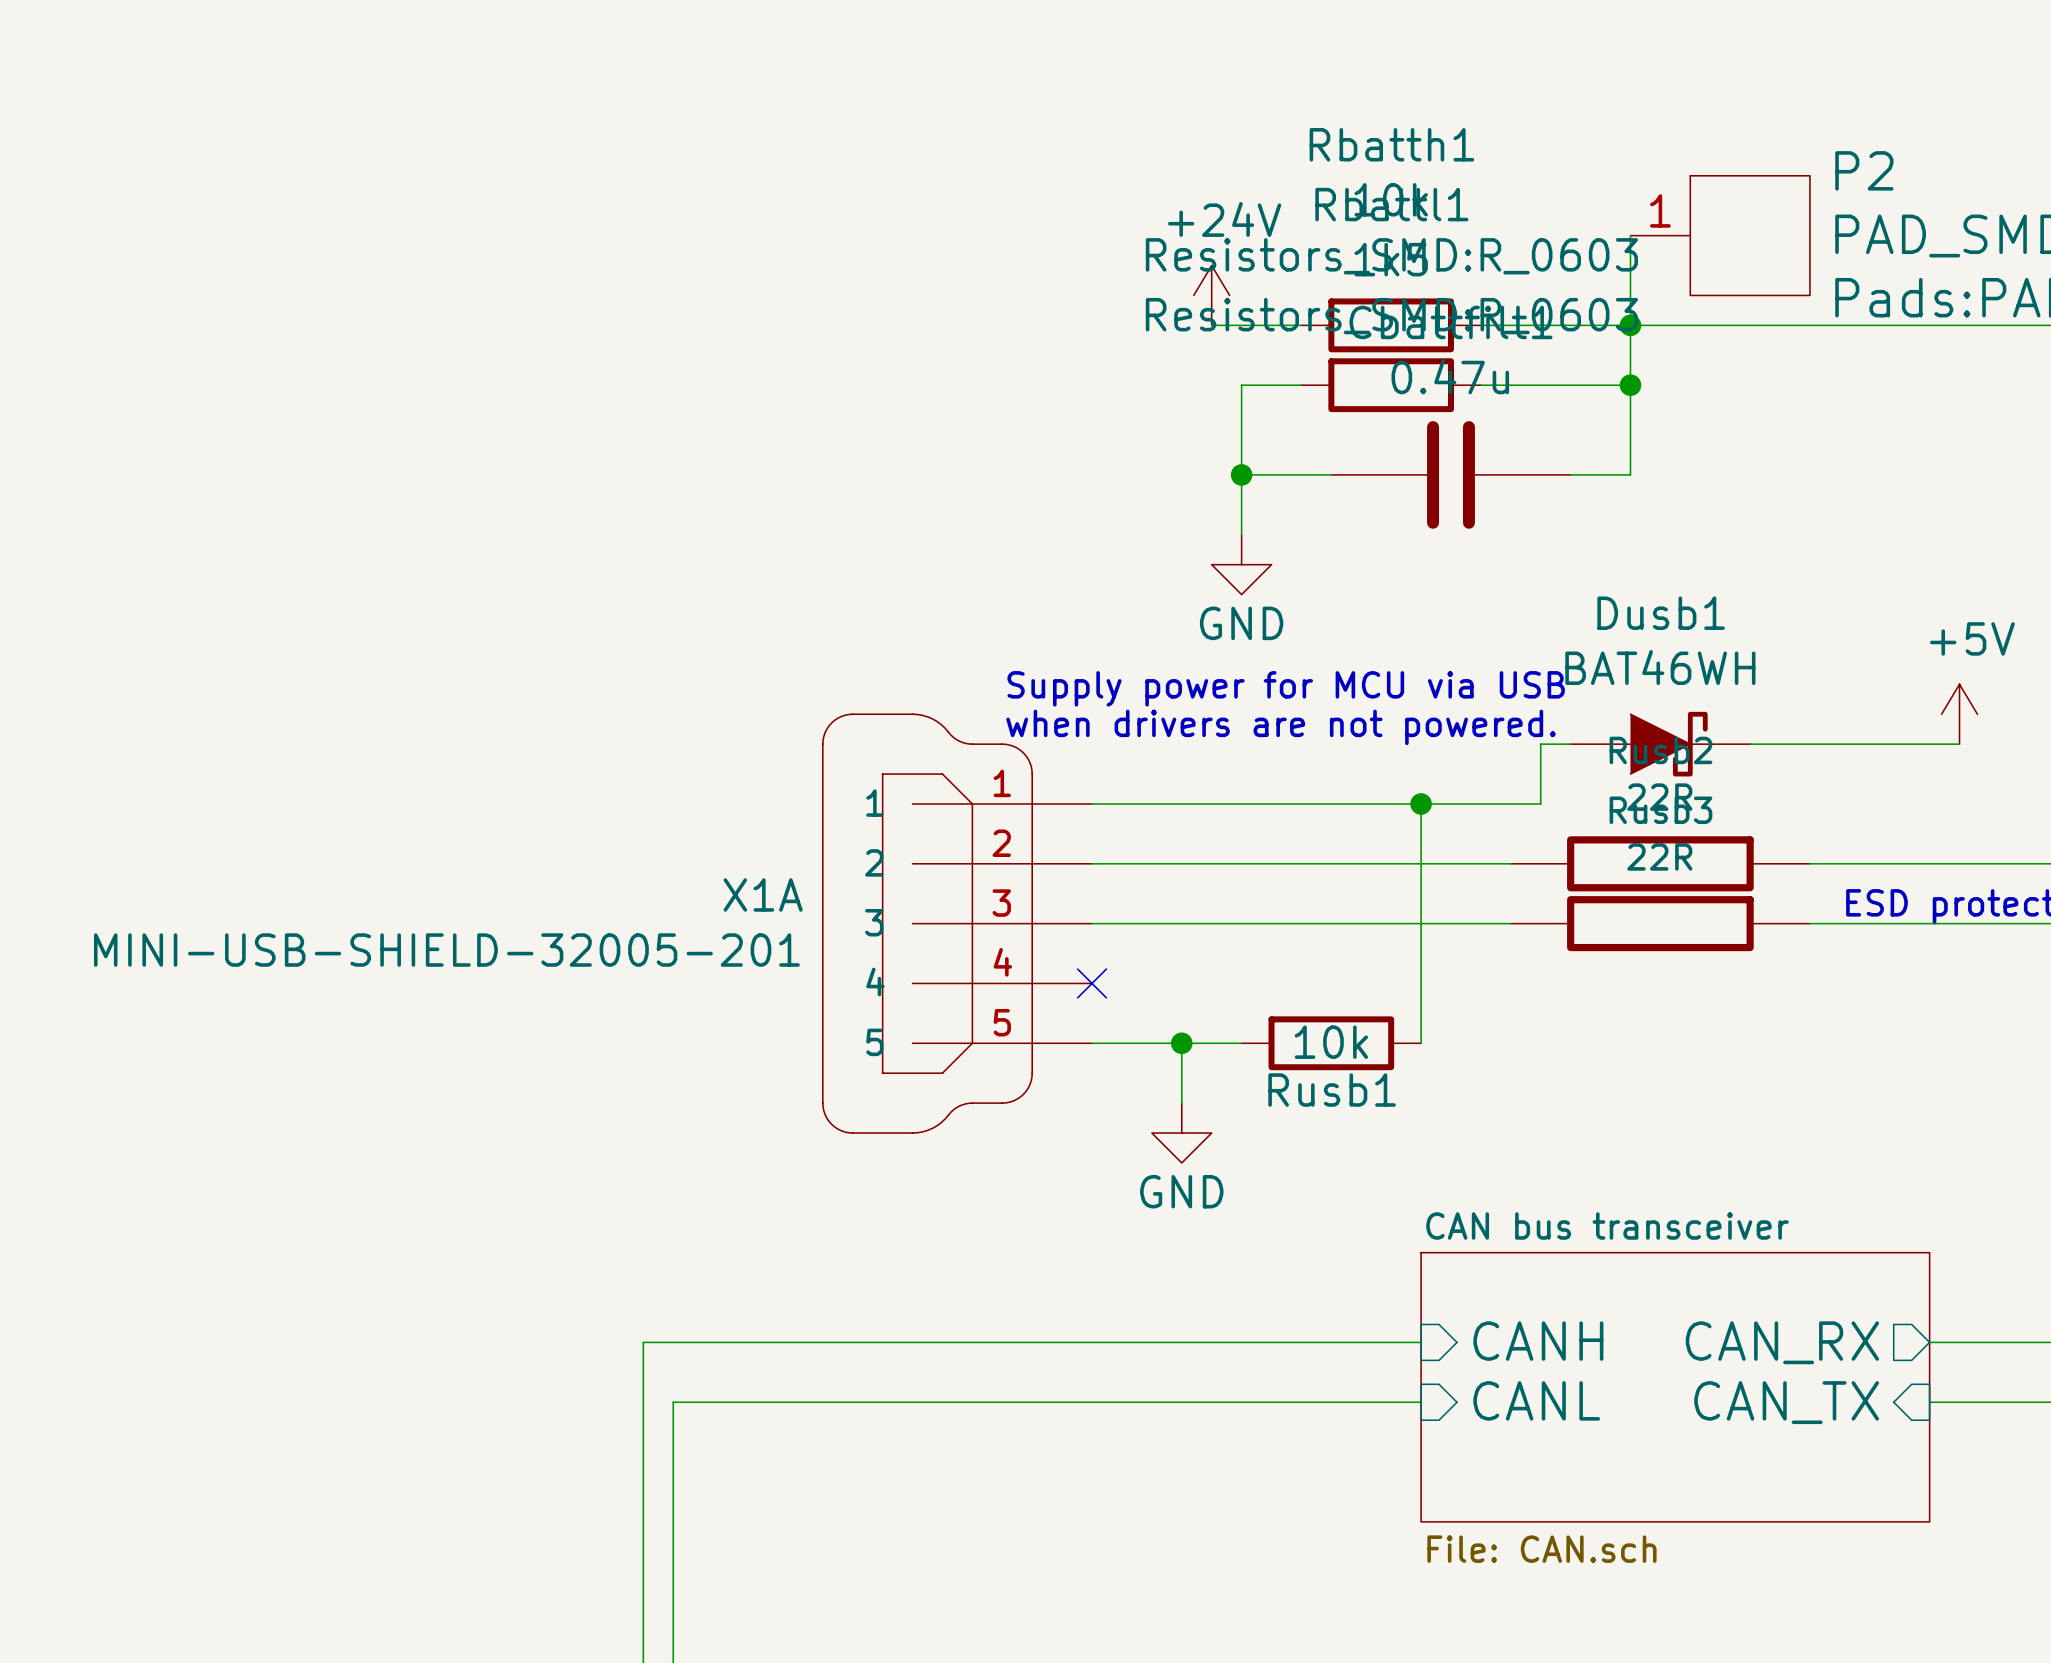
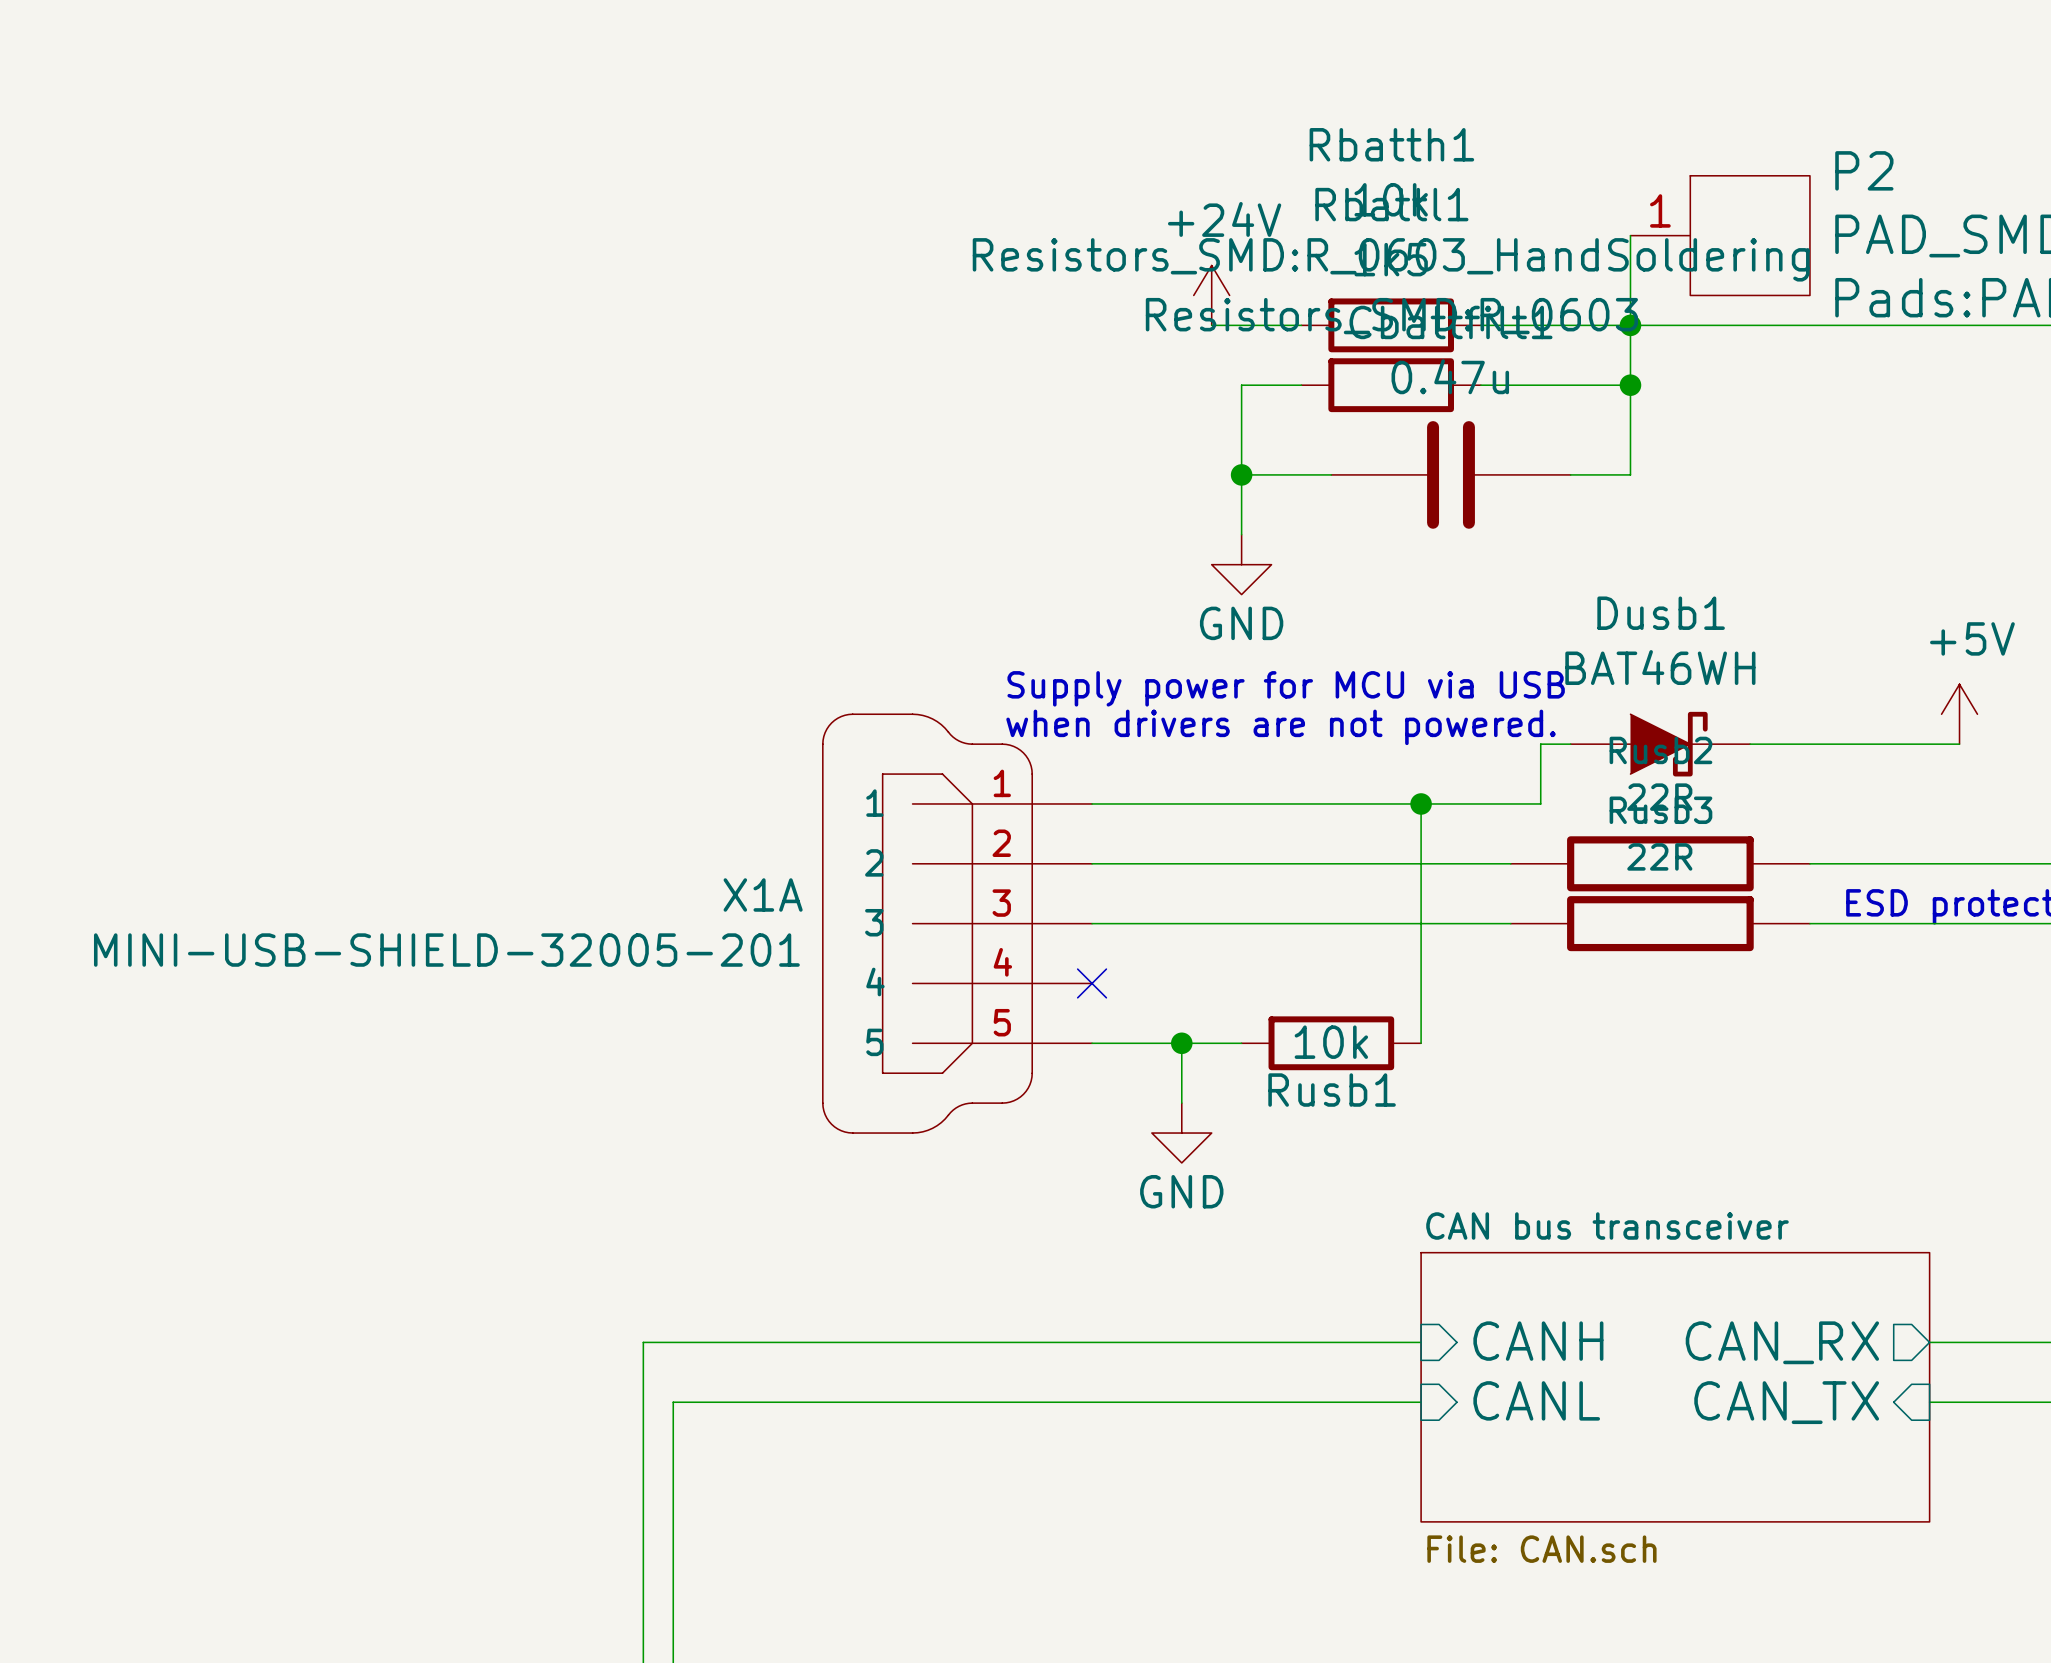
Rbatth1 text: Resistors_SMD:R_0603 (1391, 256) -> Resistors_SMD:R_0603_HandSoldering (1391, 259)

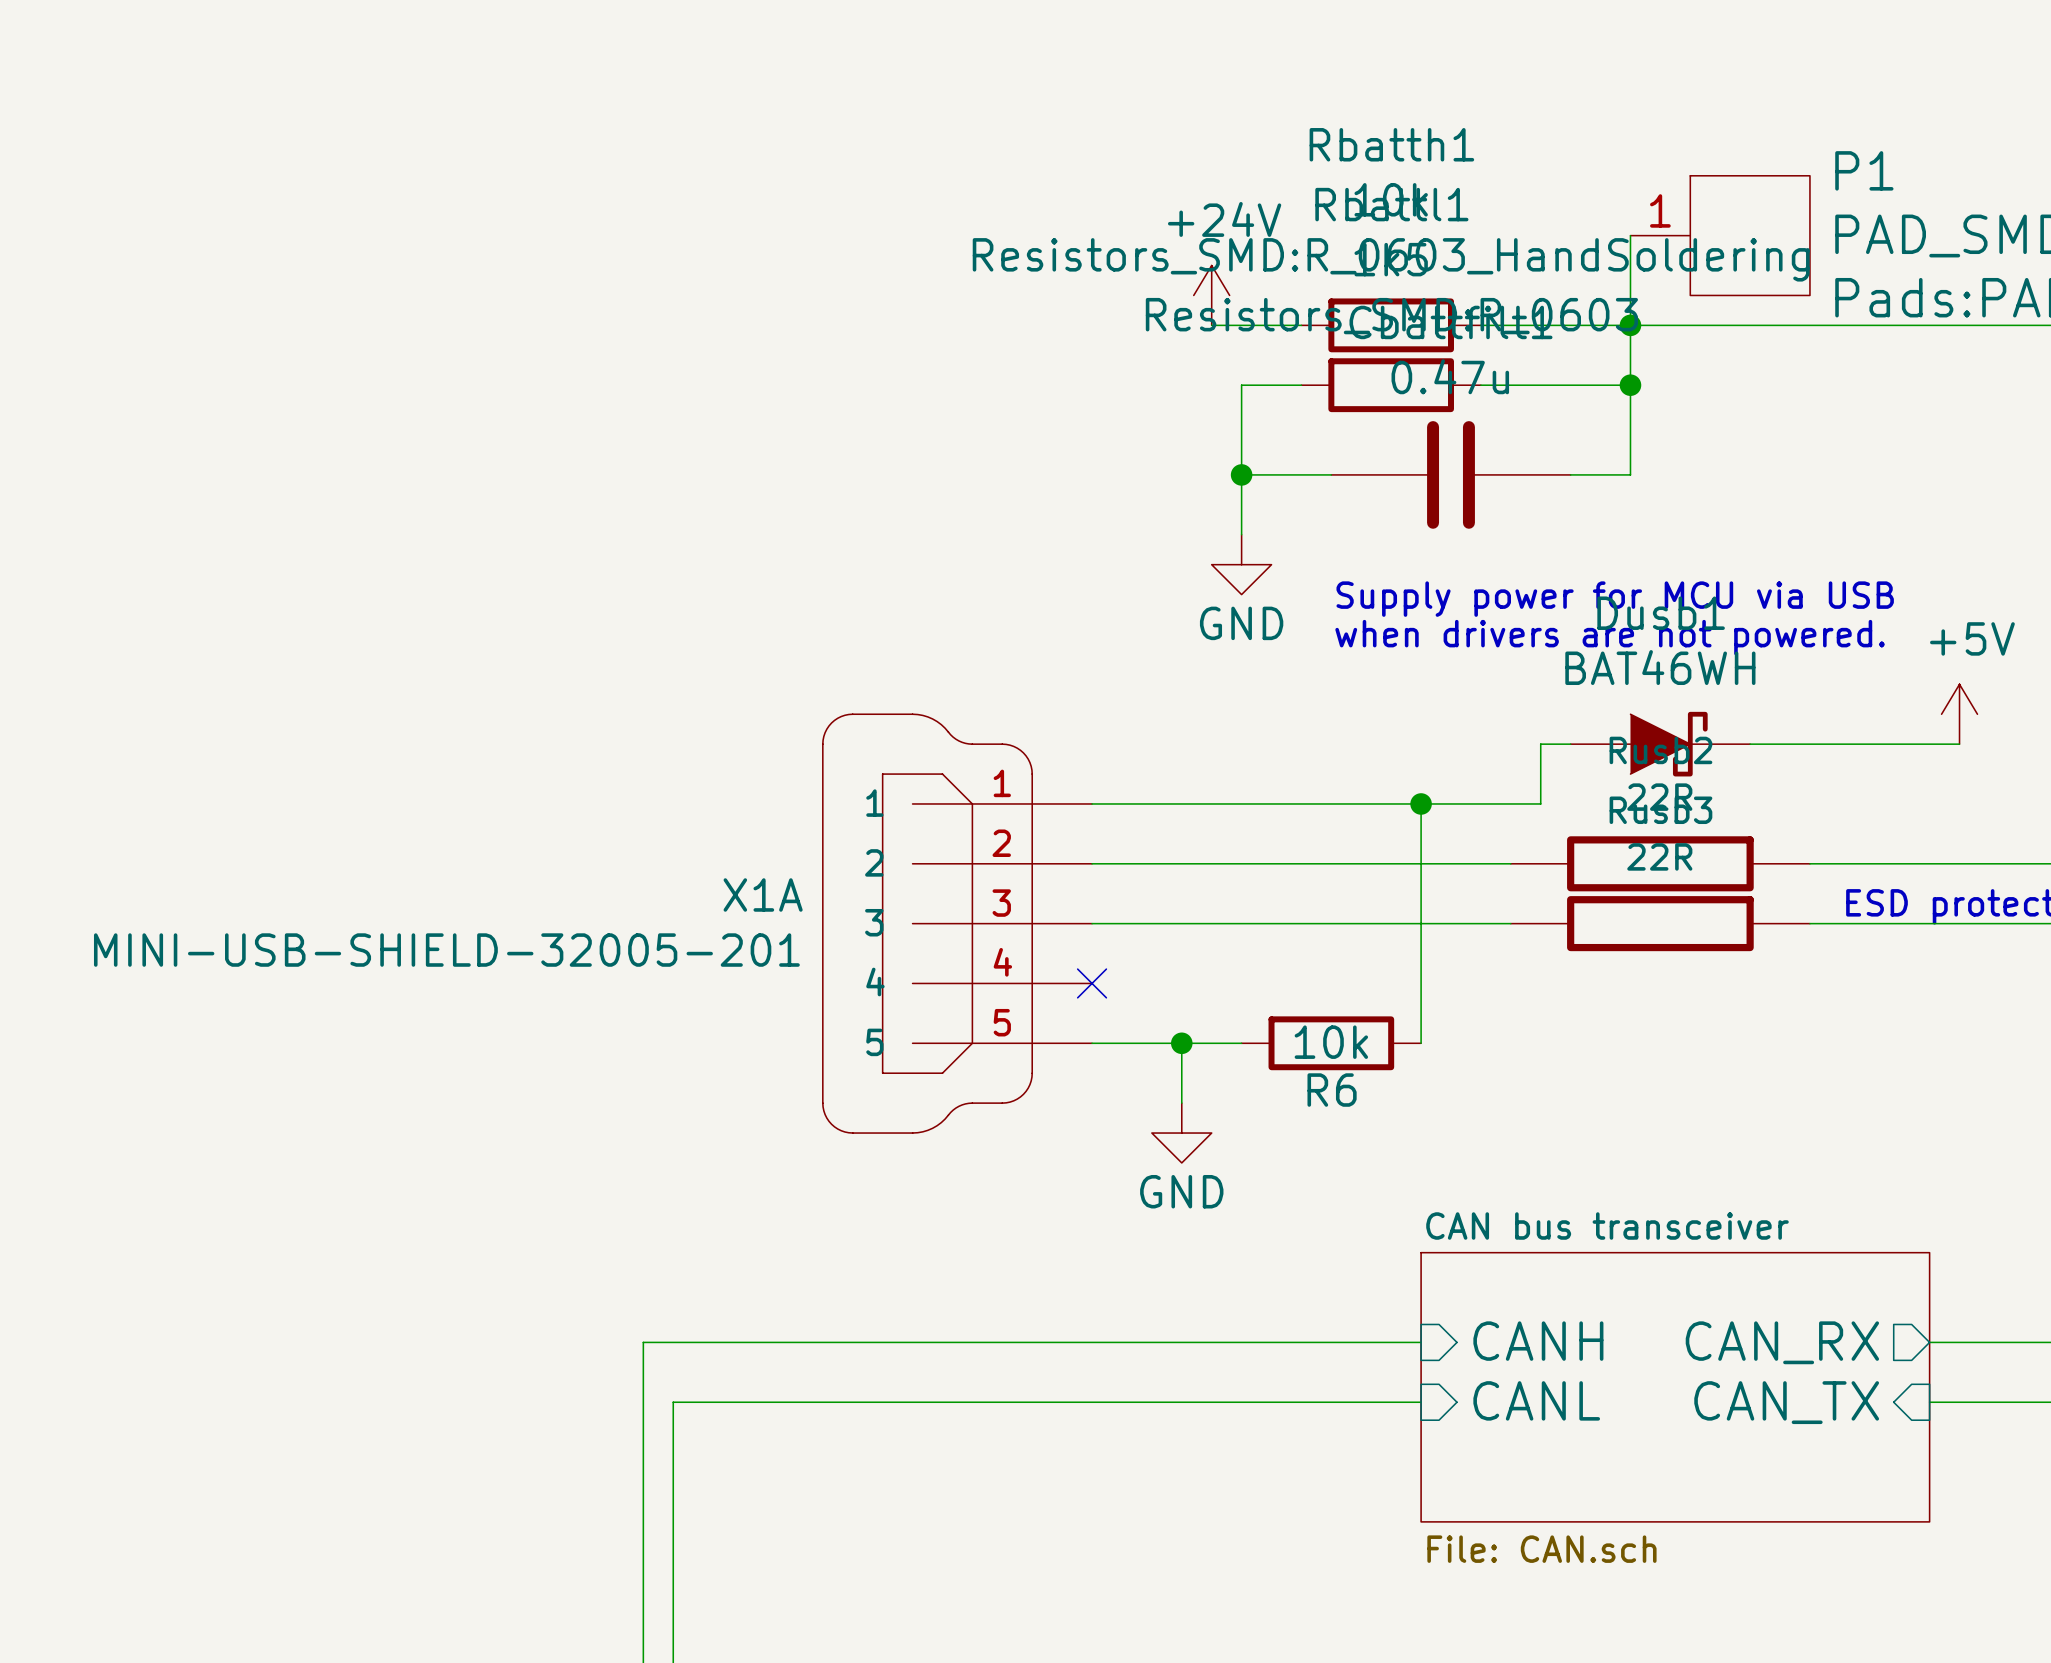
P2 name: P2 (1864, 170) -> P1 (1864, 170)
text position: Supply power for MCU via USB (1286, 688) -> Supply power for MCU via USB (1615, 599)
text position: when drivers are not powered. (1281, 727) -> when drivers are not powered. (1610, 637)
Rusb1 name: Rusb1 (1332, 1090) -> R6 (1332, 1090)

